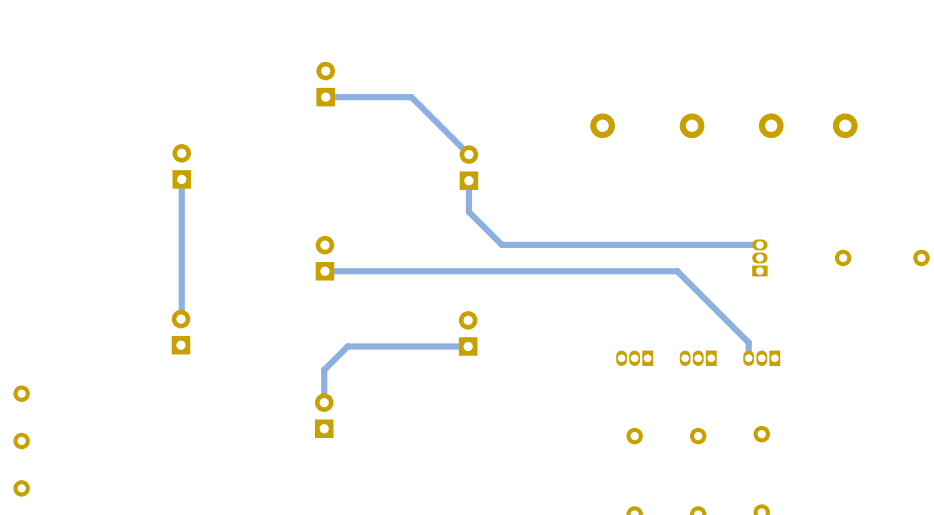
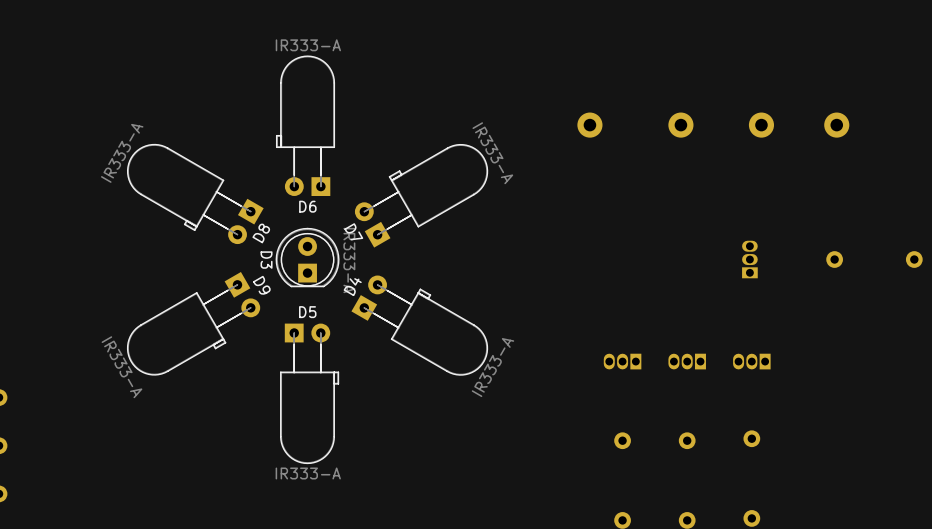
D6 side: top (325, 84) -> bottom (305, 125)
track: (325, 97) (411, 97) (468, 154) -> none
D8 side: top (181, 166) -> bottom (195, 193)
D7 side: top (468, 167) -> bottom (421, 195)
track: (181, 179) (181, 319) -> none
track: (468, 180) (468, 211) (501, 244) (759, 244) -> none
D3 side: top (324, 258) -> bottom (307, 257)
track: (324, 271) (677, 271) (748, 342) (748, 358) -> none
D9 side: top (181, 332) -> bottom (193, 323)
D4 side: top (468, 333) -> bottom (419, 325)
track: (468, 346) (347, 346) (324, 369) (324, 402) -> none
D5 side: top (324, 415) -> bottom (309, 393)

